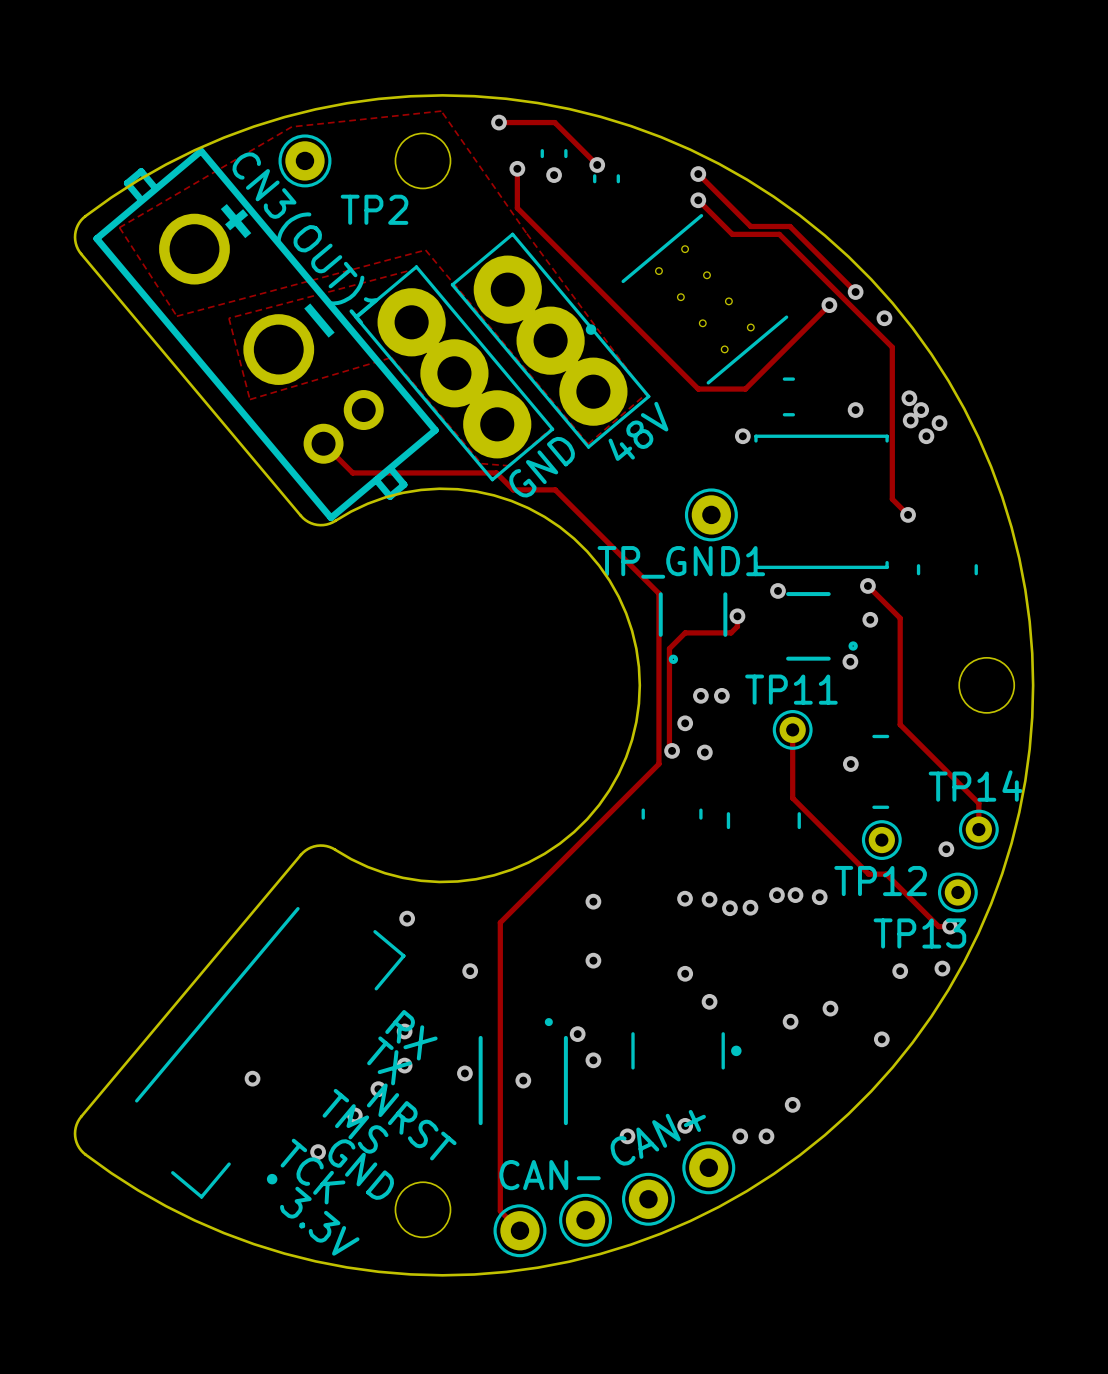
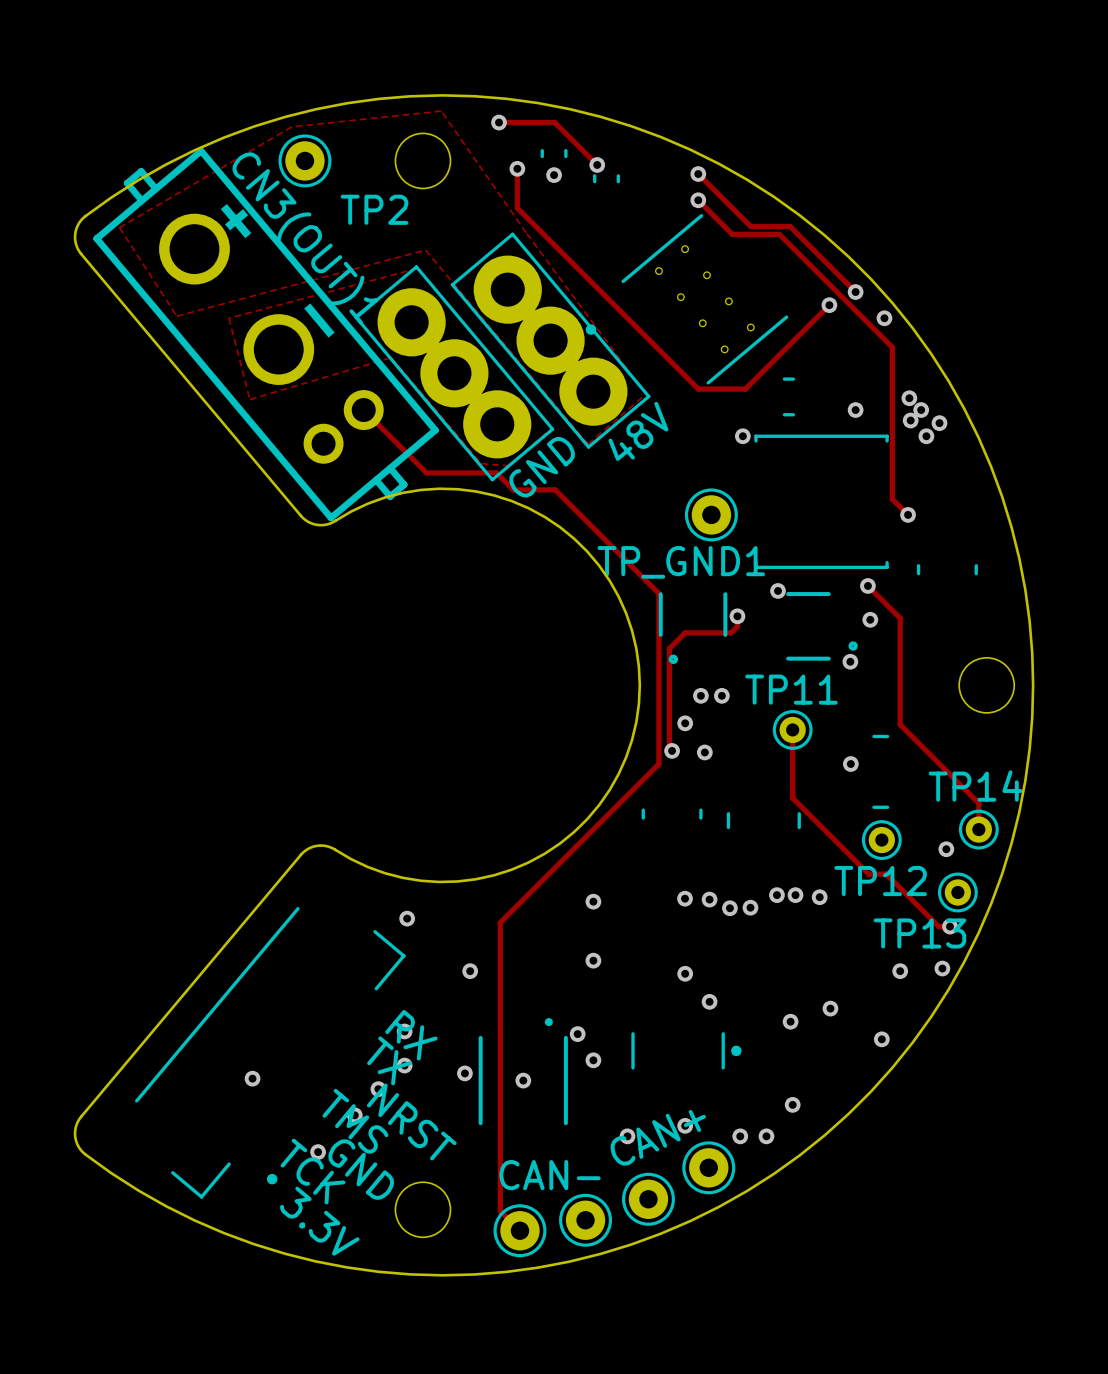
track: (323, 443) (352, 472) (426, 472) -> (363, 410) (426, 472)

